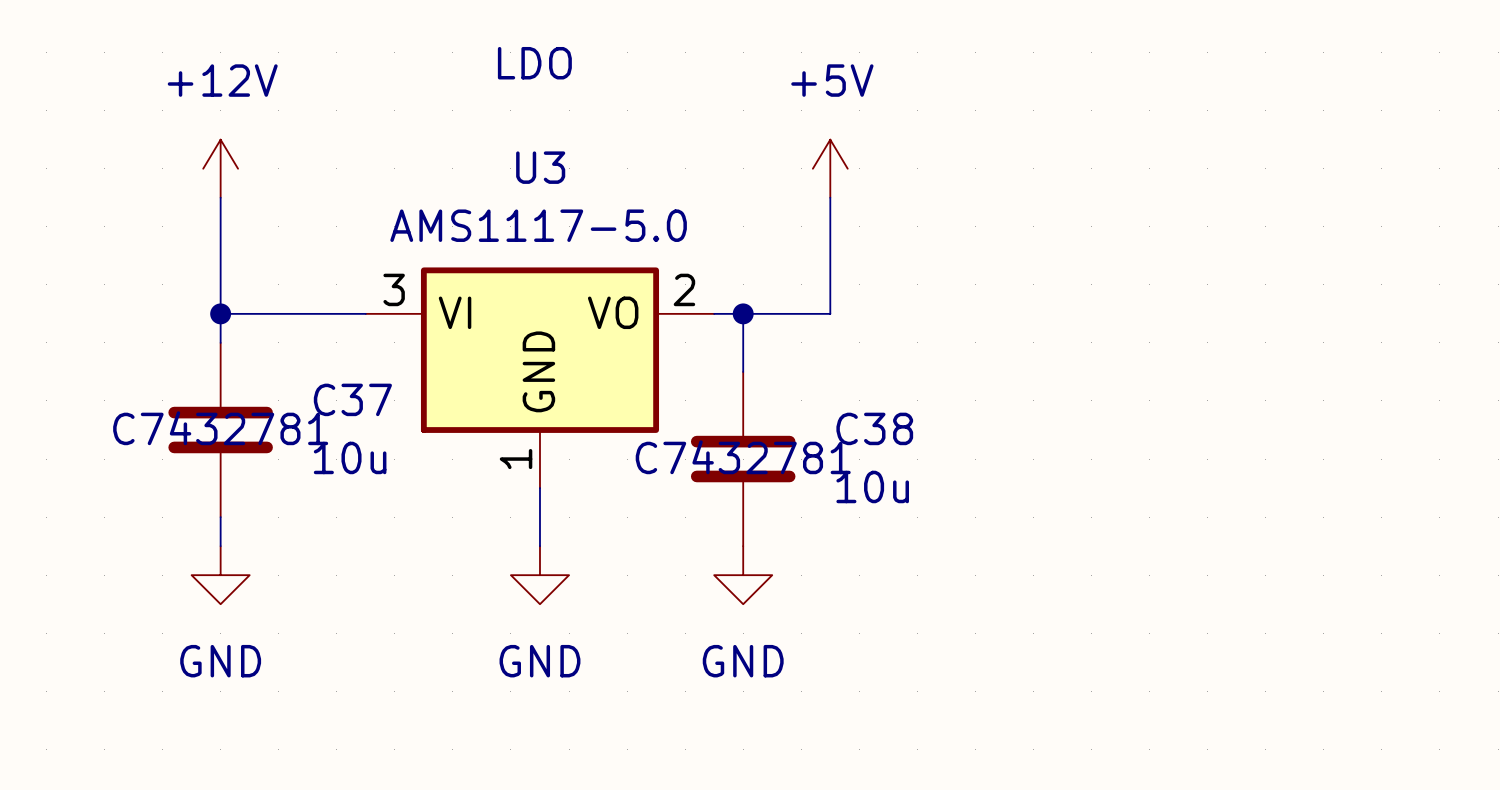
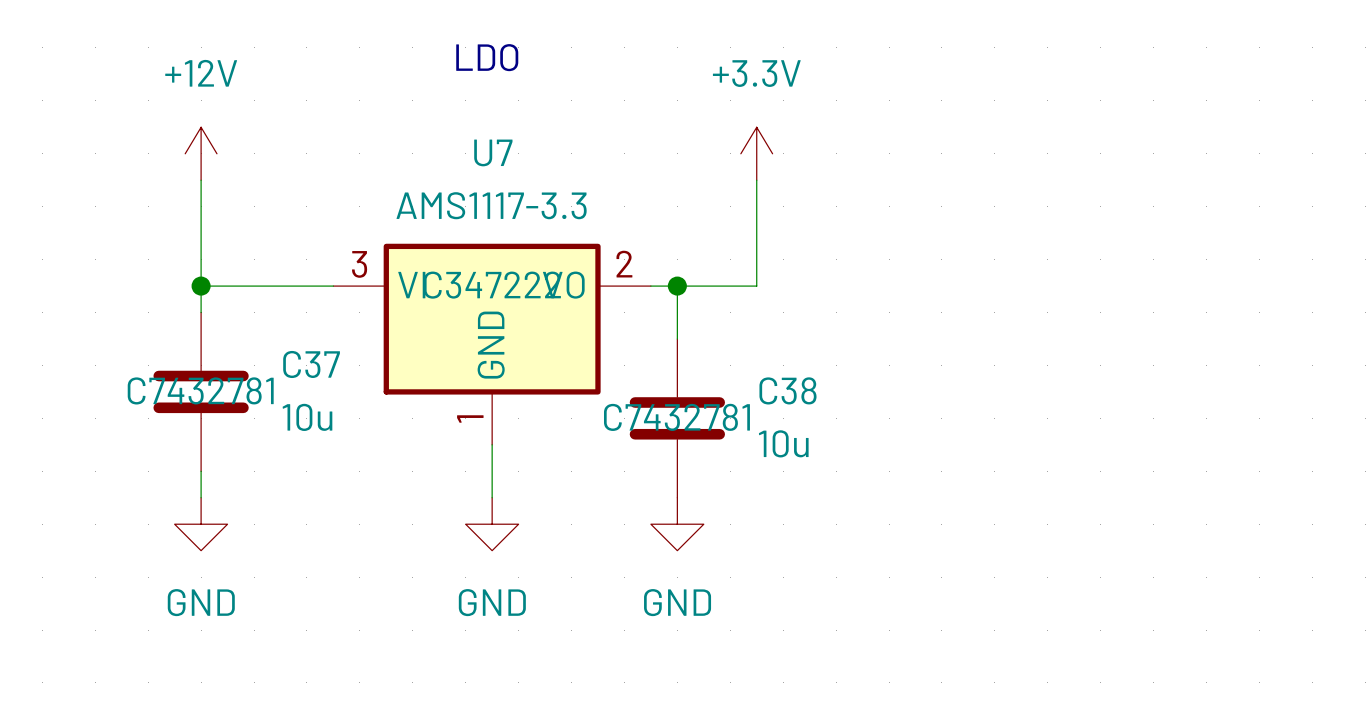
U3 name: U3 (540, 167) -> U7 (493, 152)
power symbol: +5V (830, 168) -> +3.3V (756, 153)
U3 value: AMS1117-5.0 (538, 225) -> AMS1117-3.3 (491, 205)
U3 text: none -> C347222 (492, 285)

